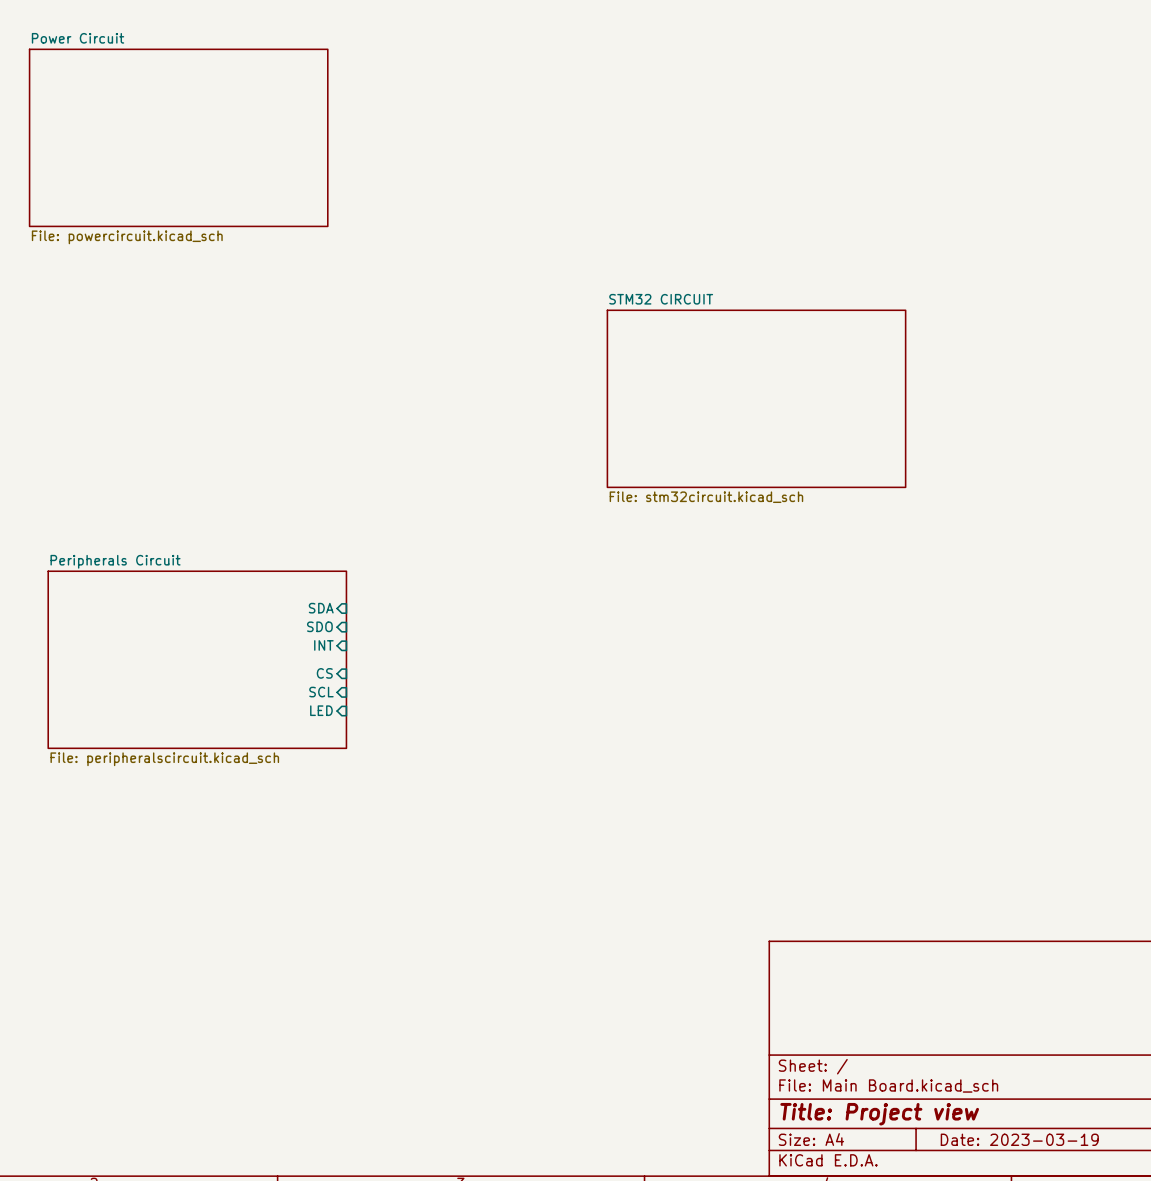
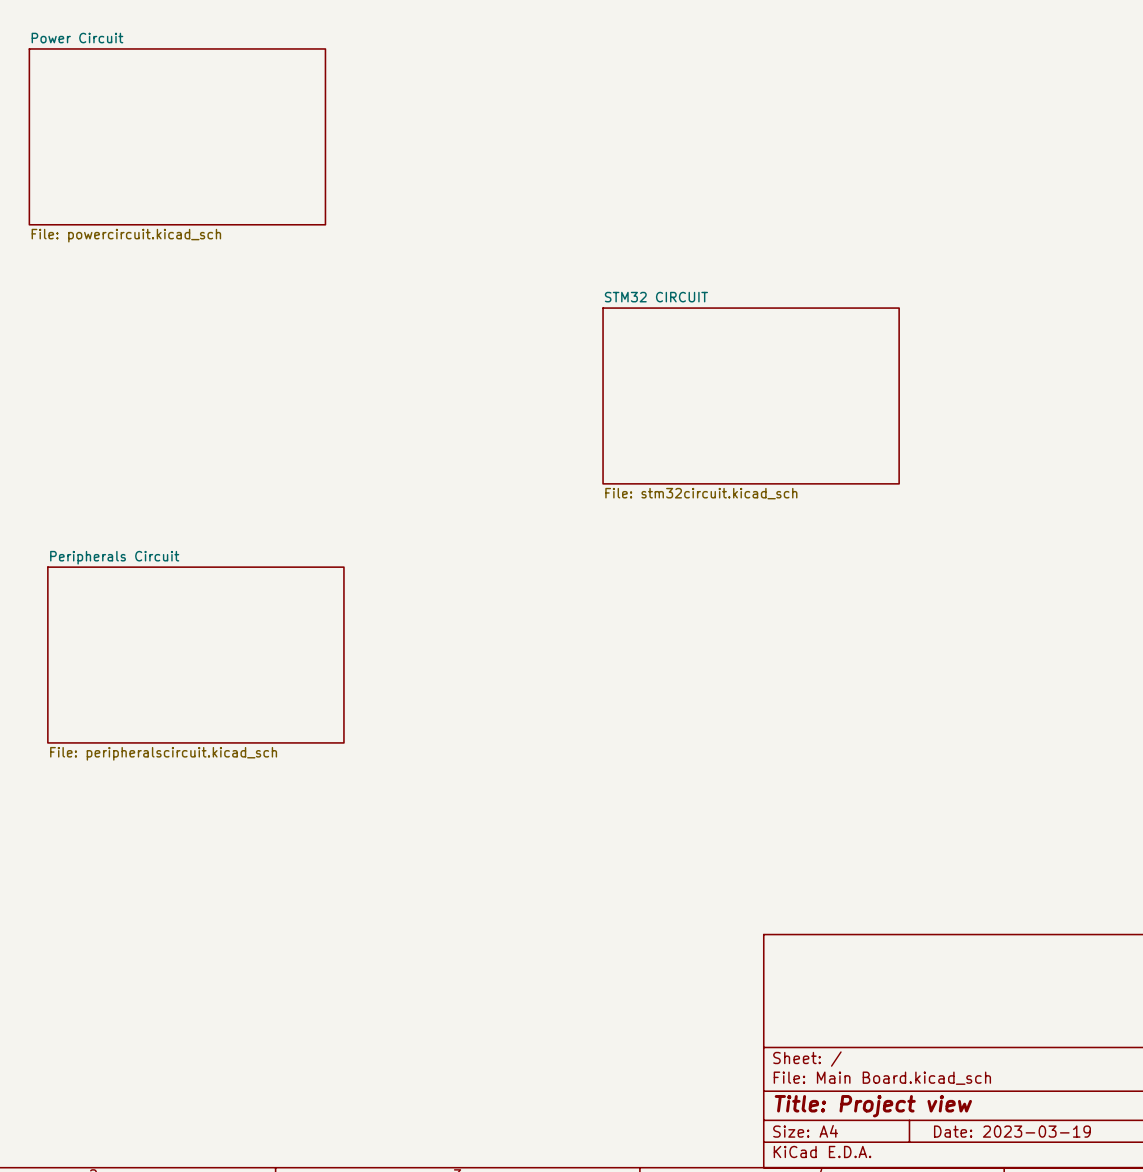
sheet pin: SDA (321, 608) -> none
sheet pin: SDO (319, 626) -> none
sheet pin: INT (323, 645) -> none
sheet pin: CS (324, 673) -> none
sheet pin: SCL (321, 692) -> none
sheet pin: LED (321, 710) -> none

